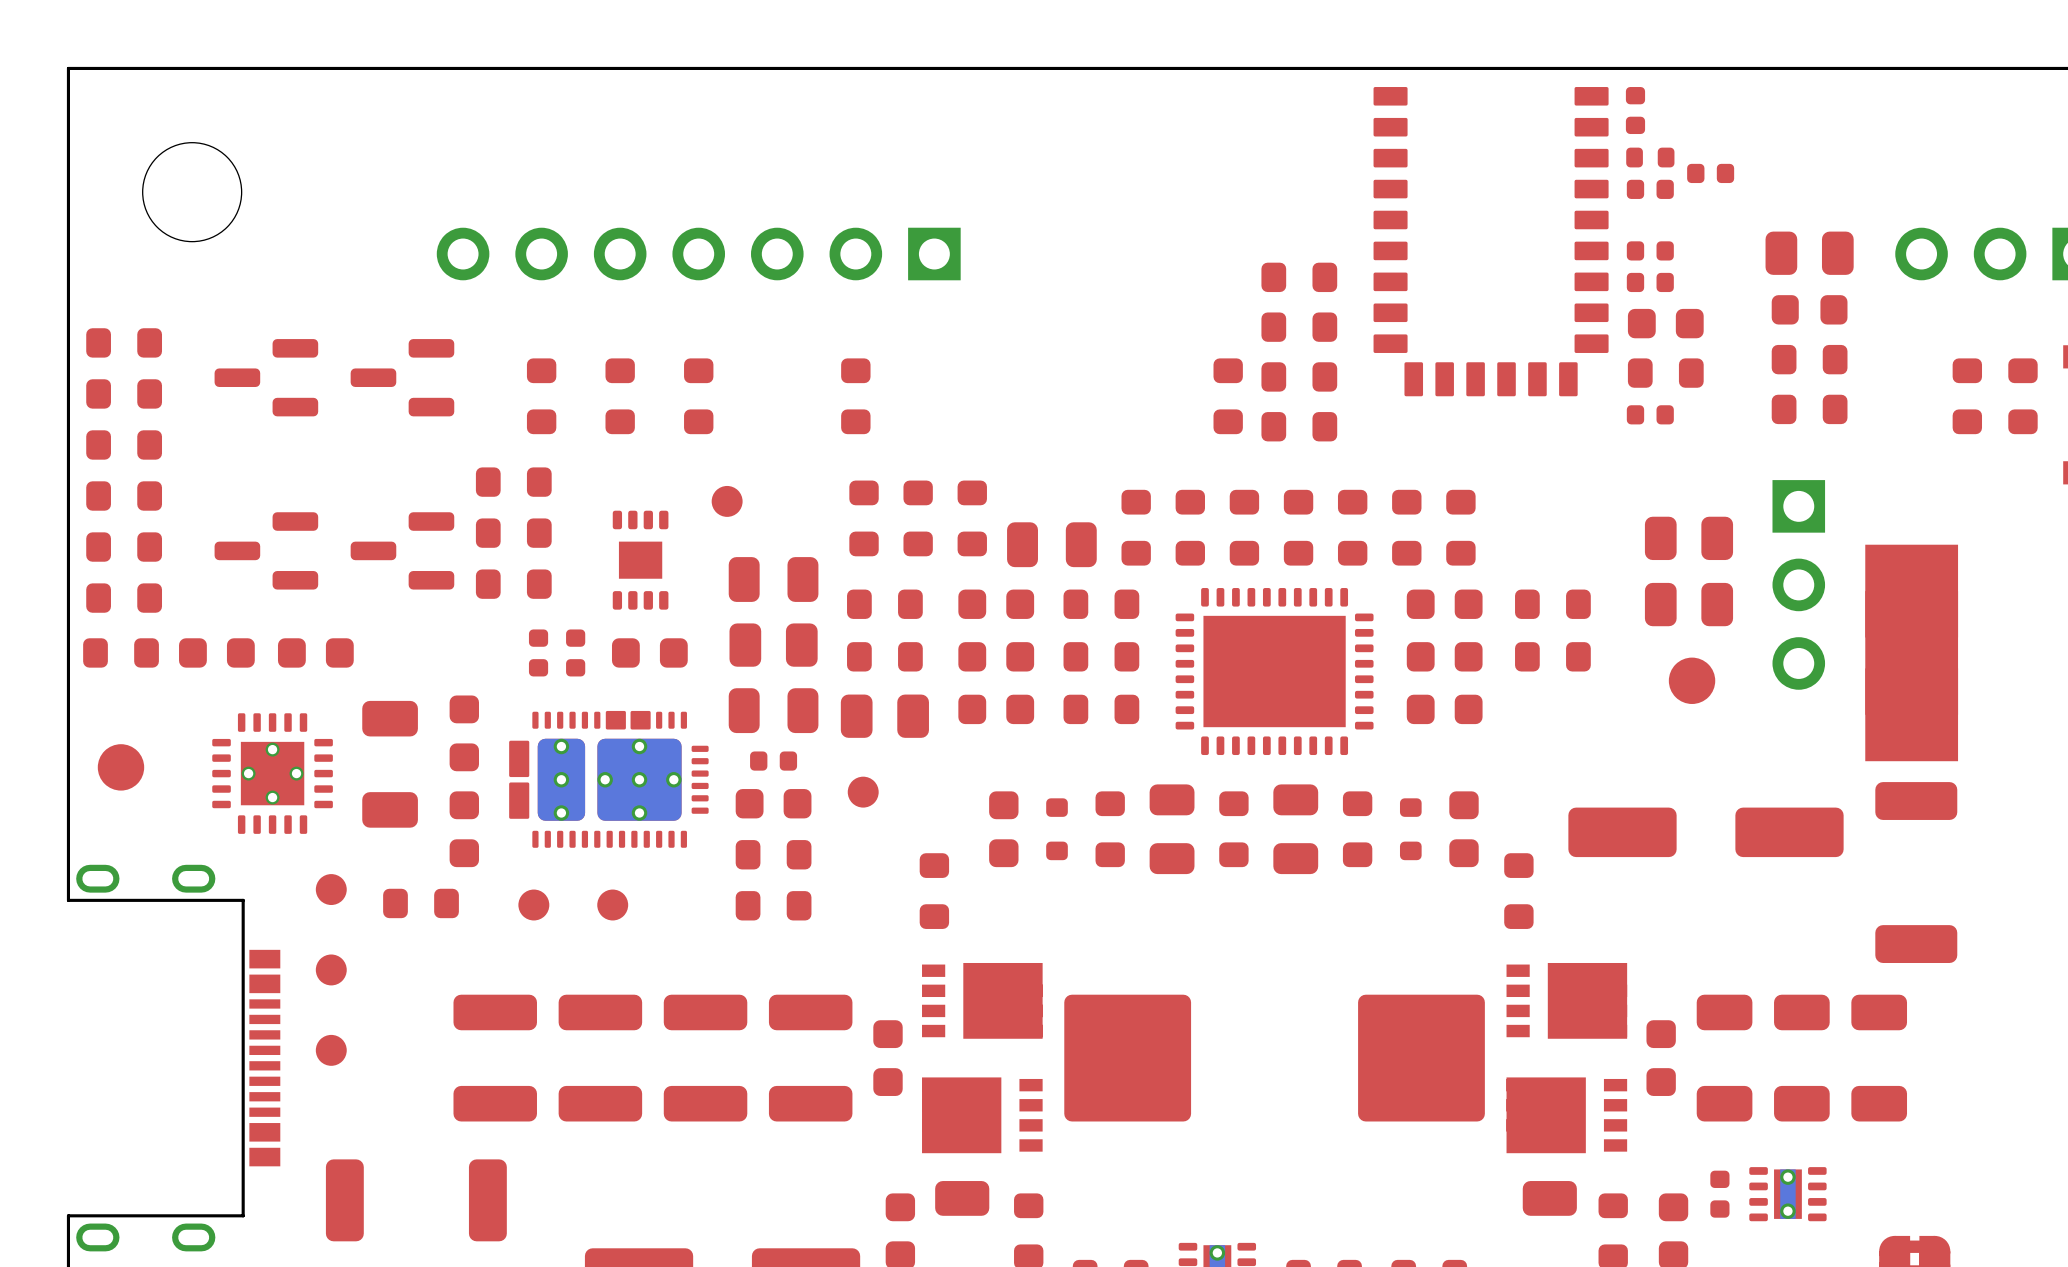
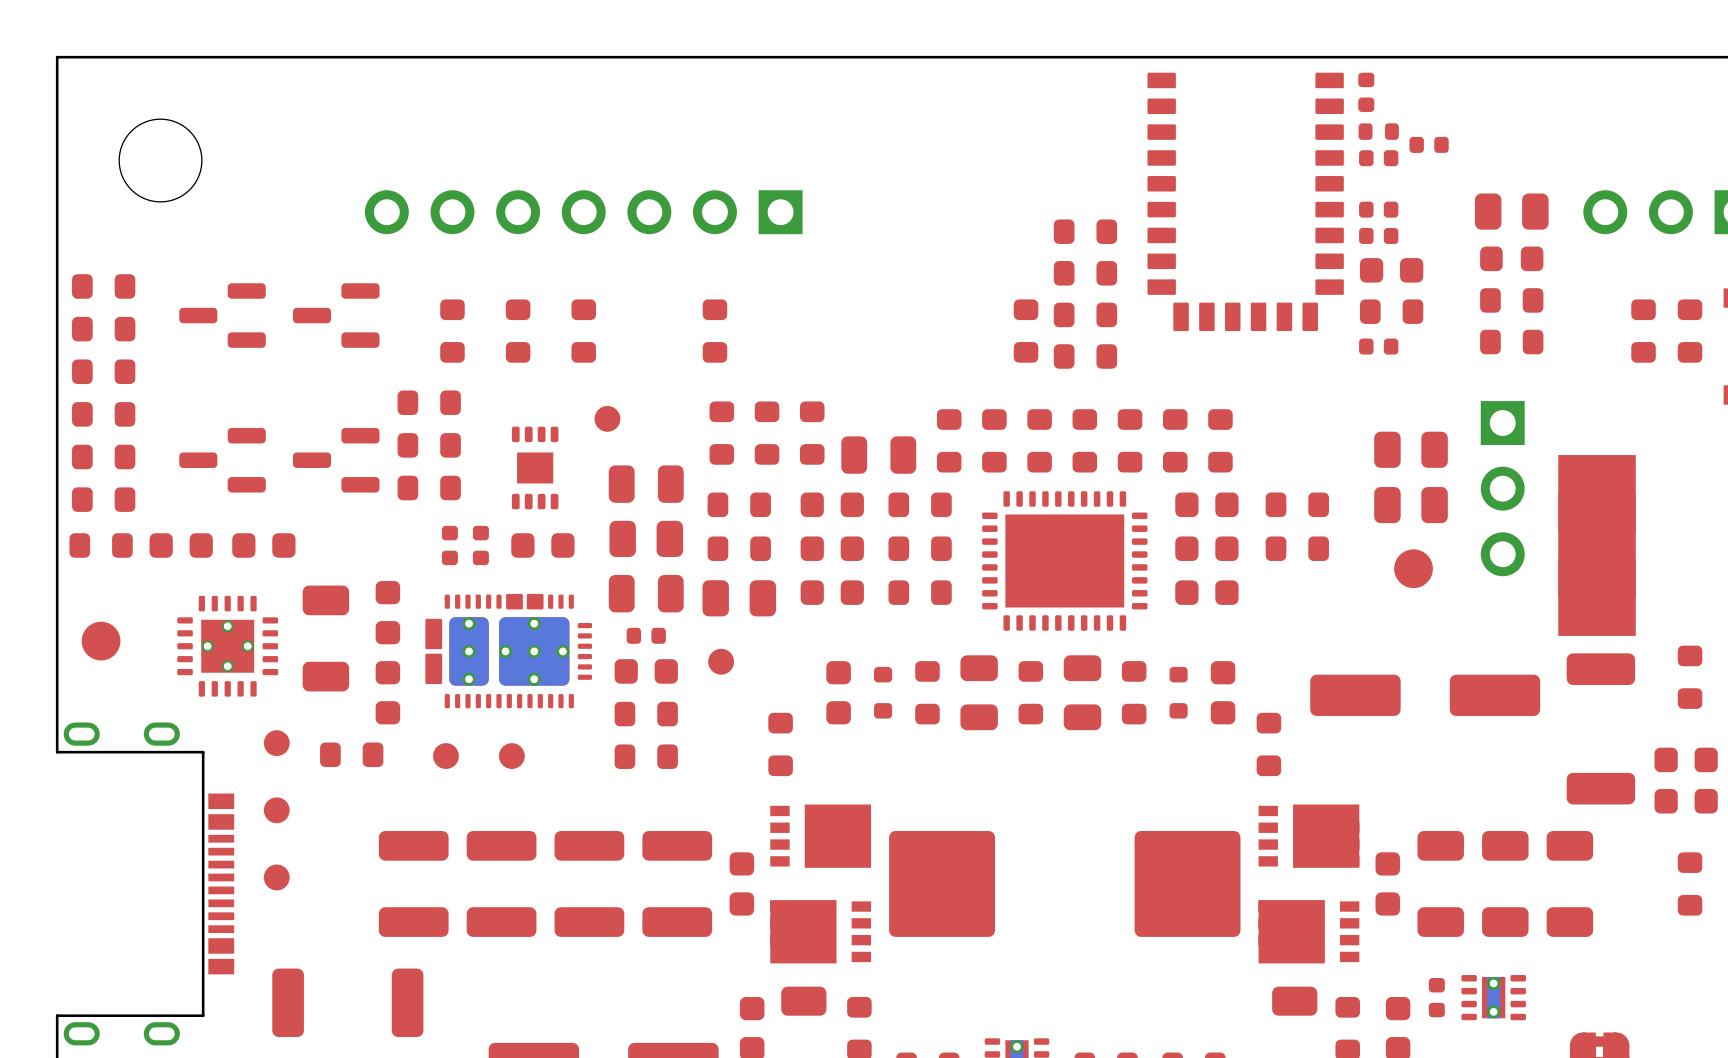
part: none -> (1690, 677)
part: none -> (1686, 759)
part: none -> (1686, 801)
part: none -> (1690, 883)

